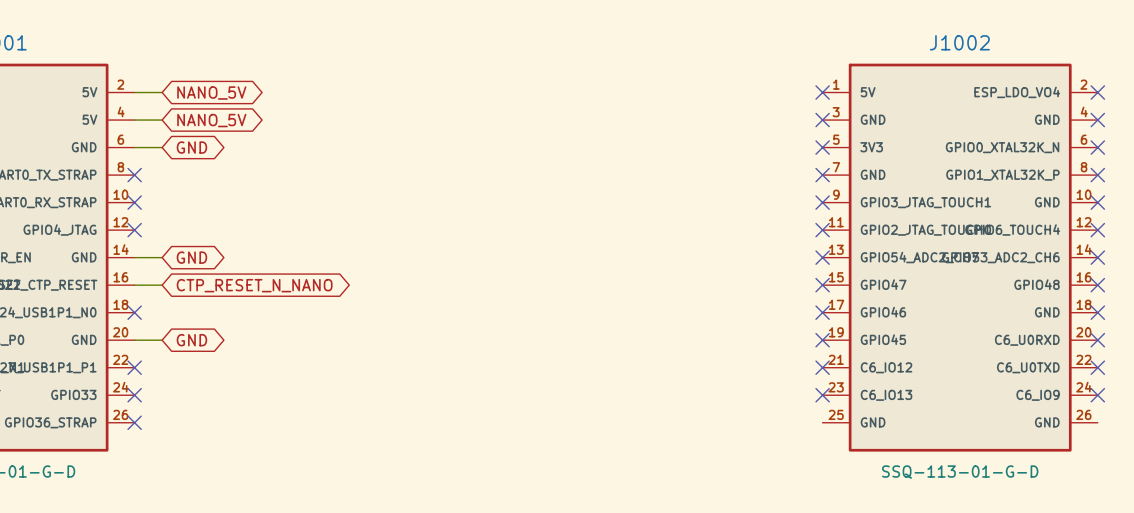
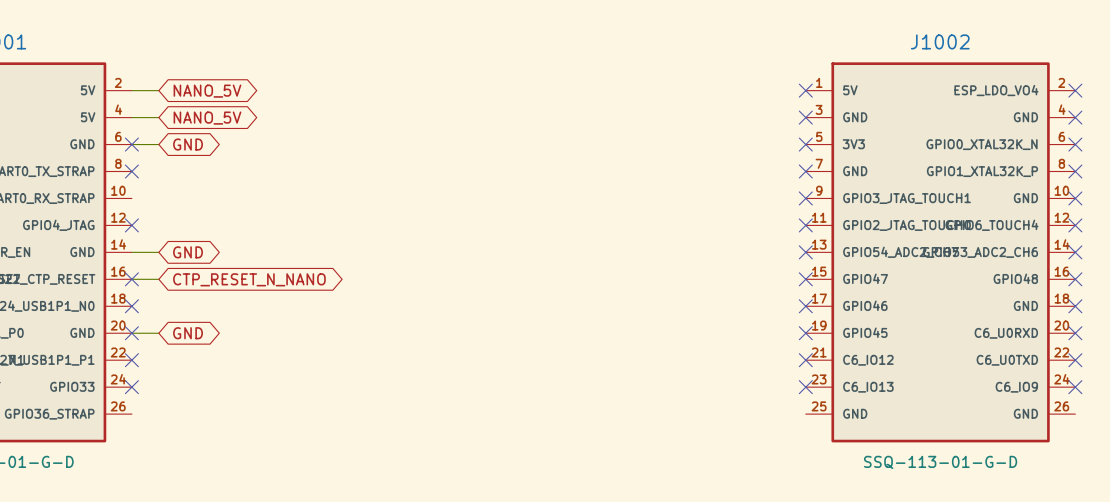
no-connect mark: none -> (131, 144)
no-connect mark: (134, 202) -> none
no-connect mark: none -> (131, 279)
no-connect mark: none -> (131, 333)
no-connect mark: (134, 422) -> none

